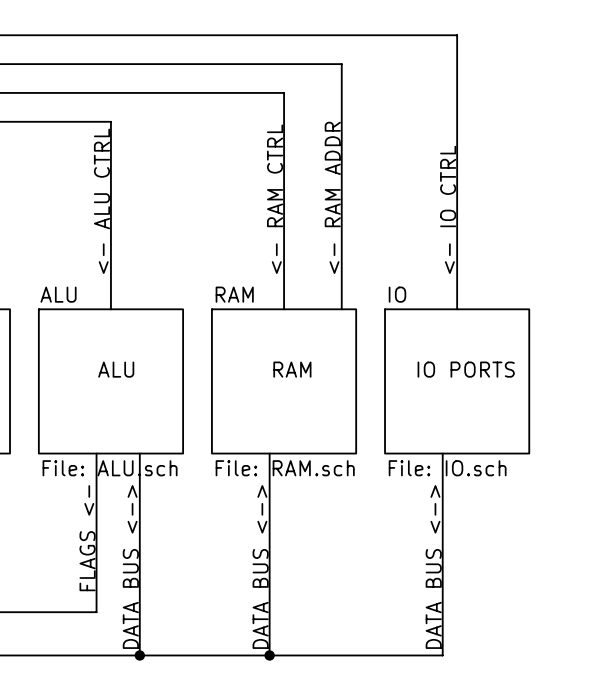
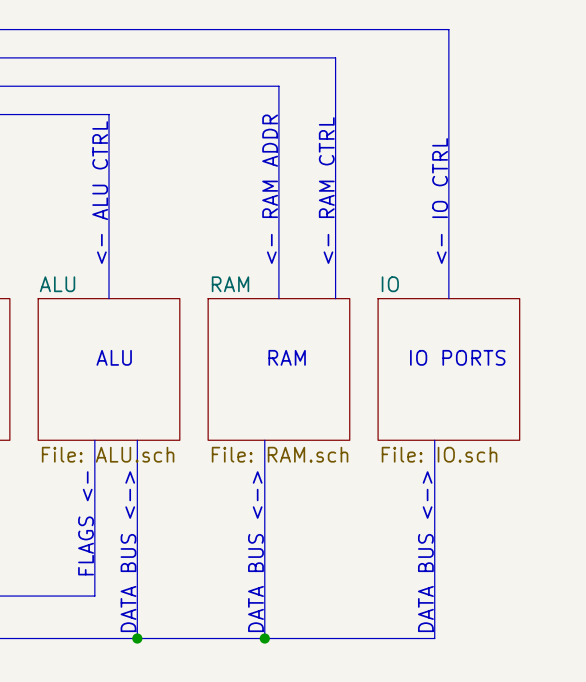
text: <- RAM ADDR (332, 197) -> <- RAM CTRL (326, 190)
text: <- RAM CTRL (275, 199) -> <- RAM ADDR (270, 189)

